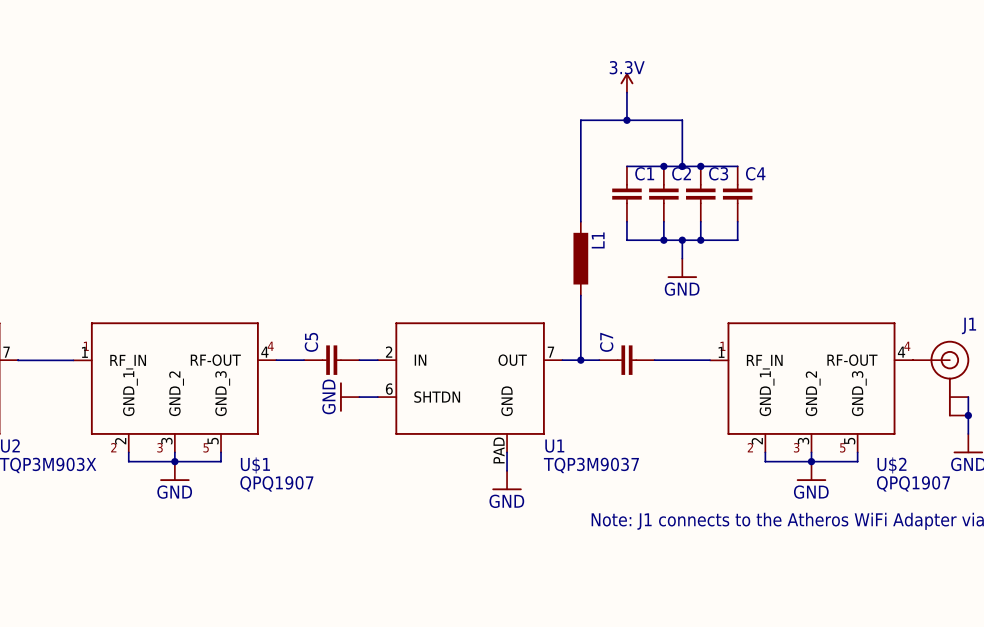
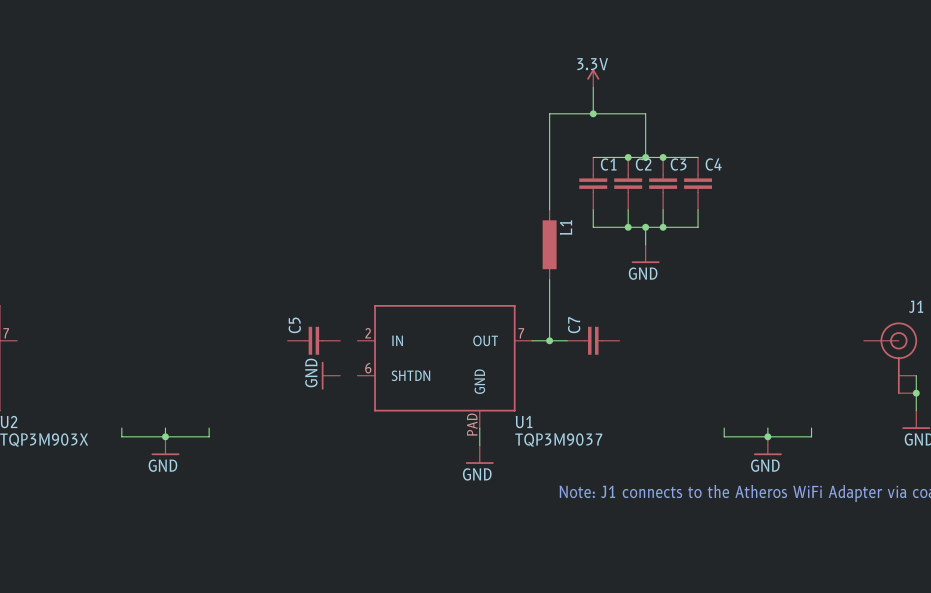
wire: (18, 360) (73, 360) -> none
wire: (276, 360) (304, 360) -> none
wire: (359, 360) (377, 360) -> none
wire: (654, 360) (710, 360) -> none
U$1: (174, 387) -> none
U$2: (811, 387) -> none
wire: (359, 397) (377, 397) -> none

